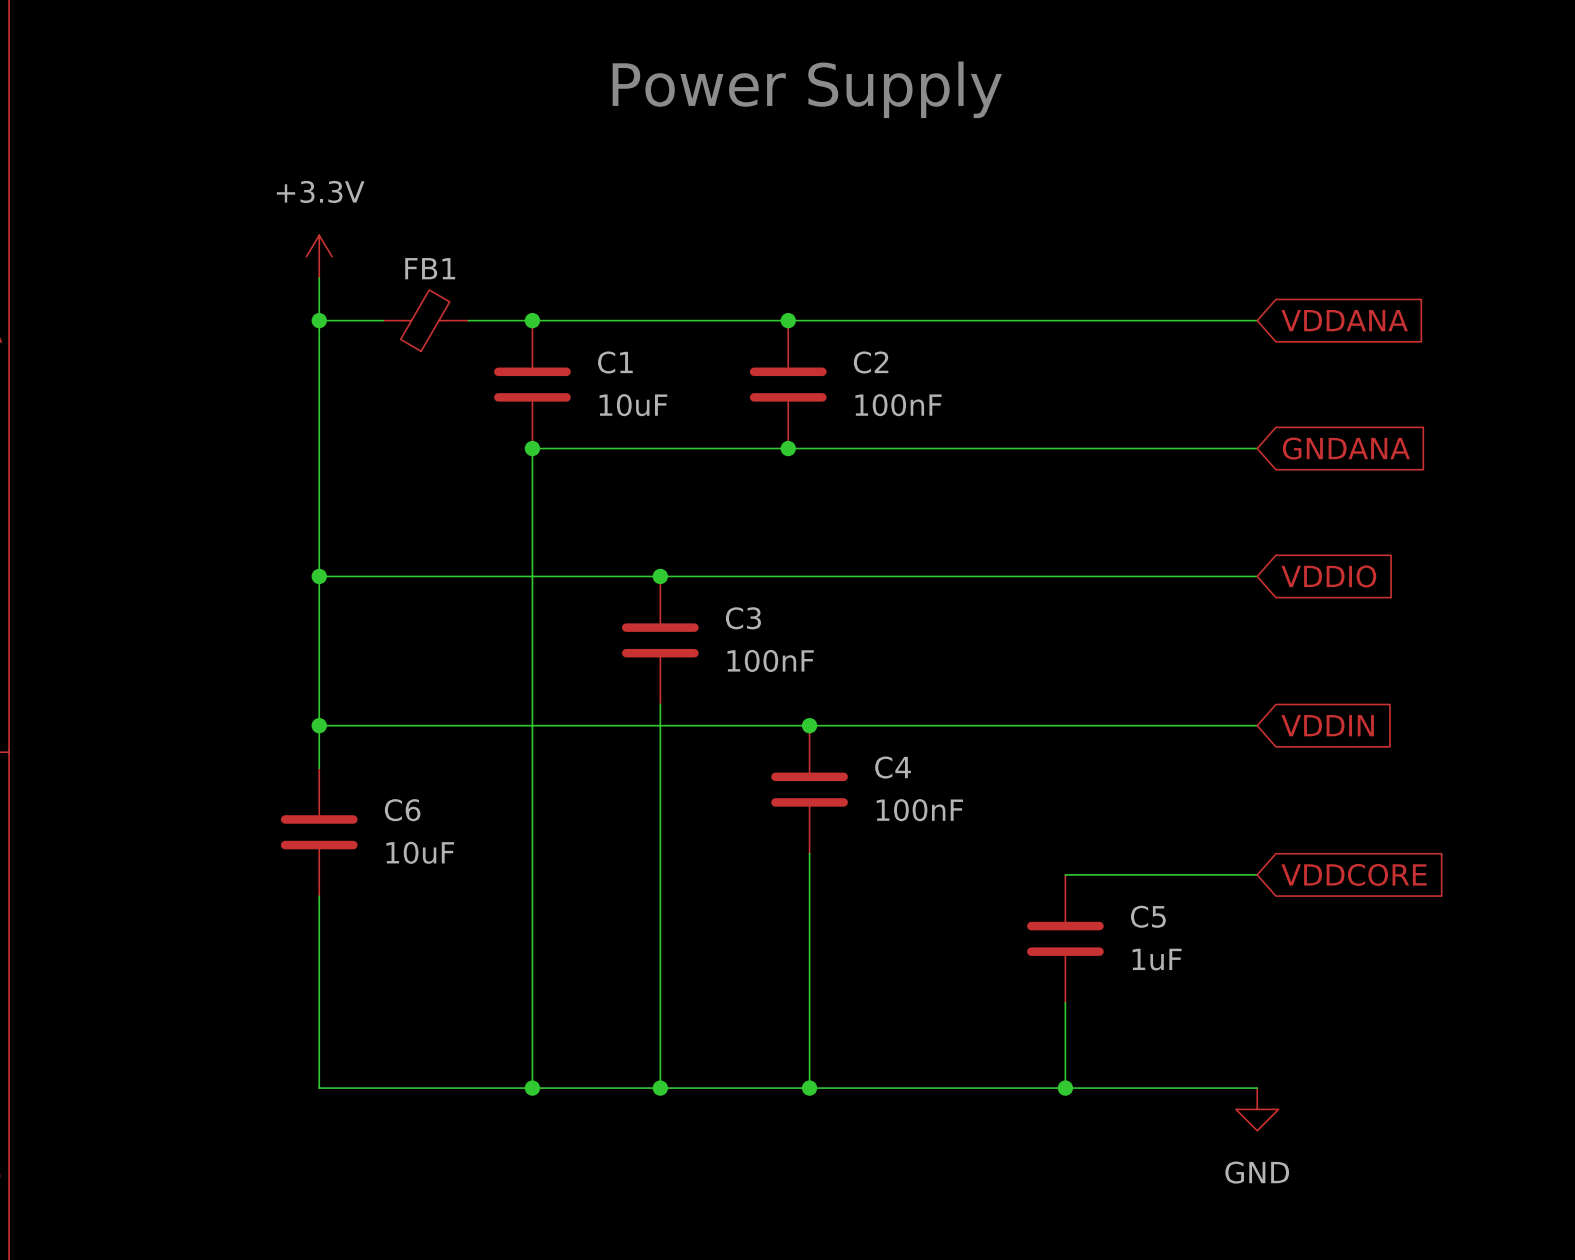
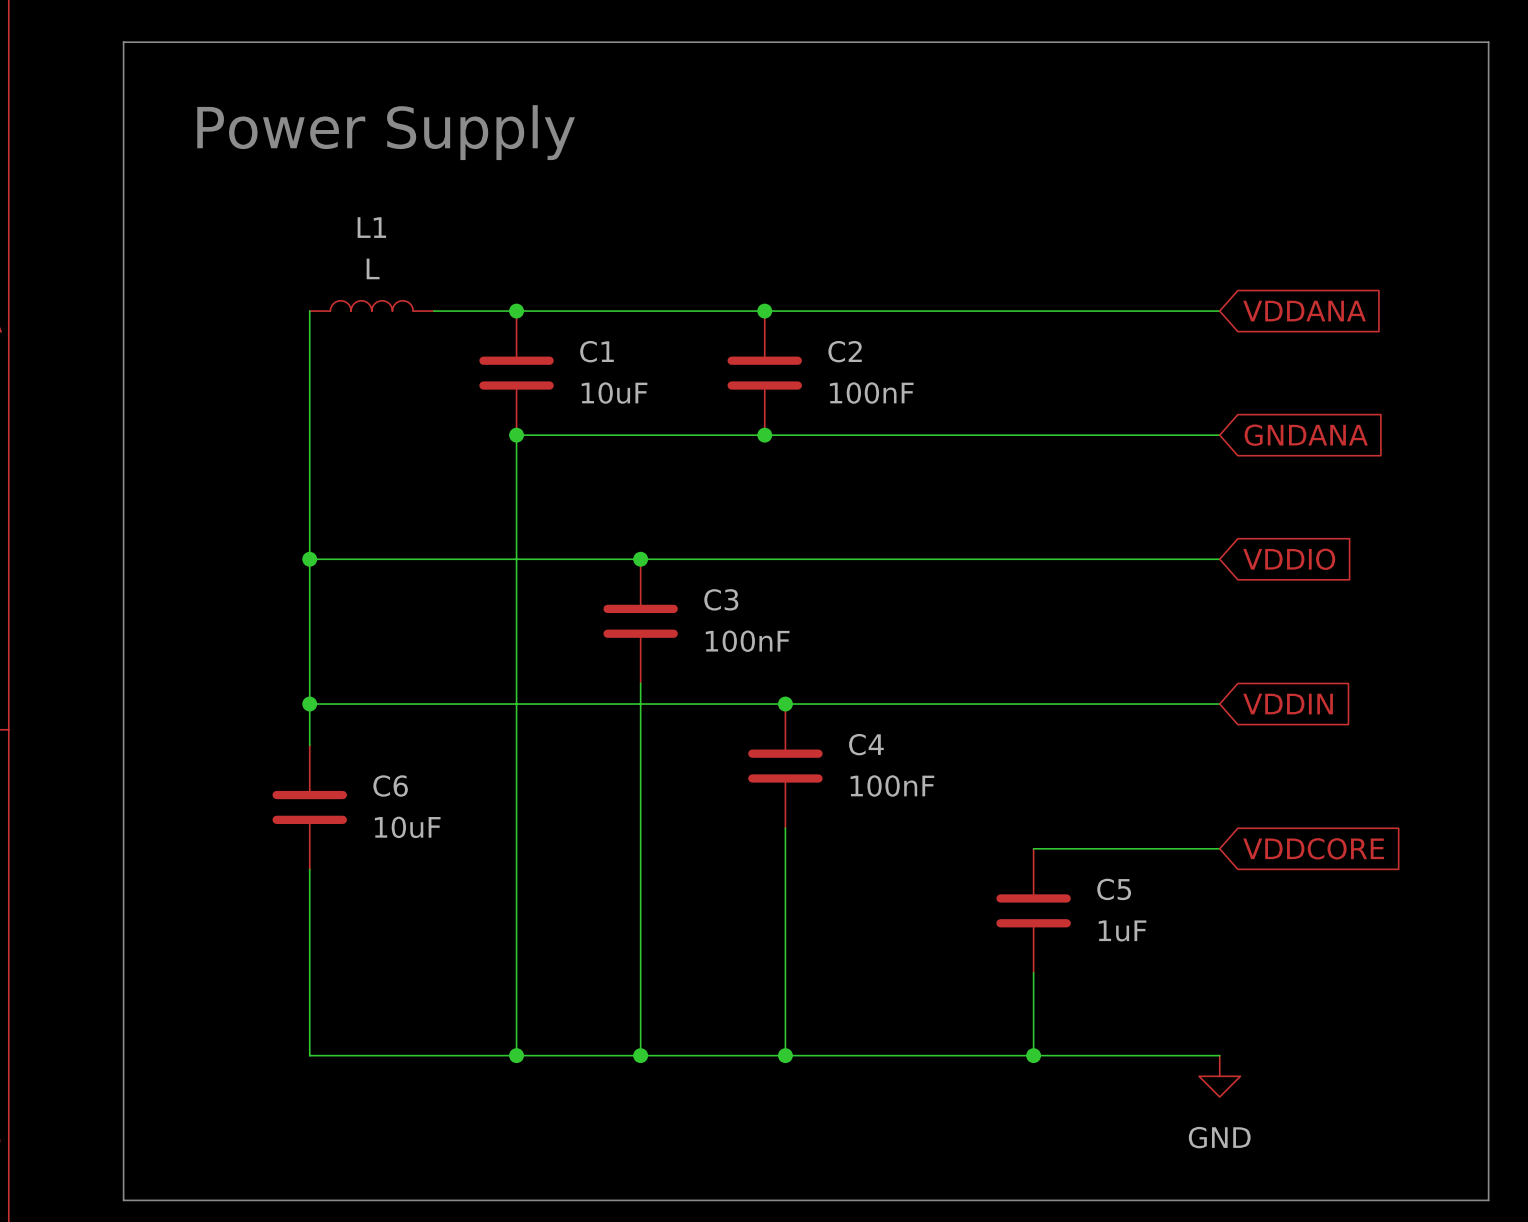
line: none -> (123, 42) (1488, 42) (1488, 1200) (123, 1200) (123, 42)
text position: Power Supply (807, 89) -> Power Supply (386, 132)
power symbol: +3.3V (319, 256) -> none
wire: (319, 278) (319, 320) (383, 320) -> none
L1: none -> L (371, 305)
junction: (319, 320) -> none
FB1: (425, 320) -> none

